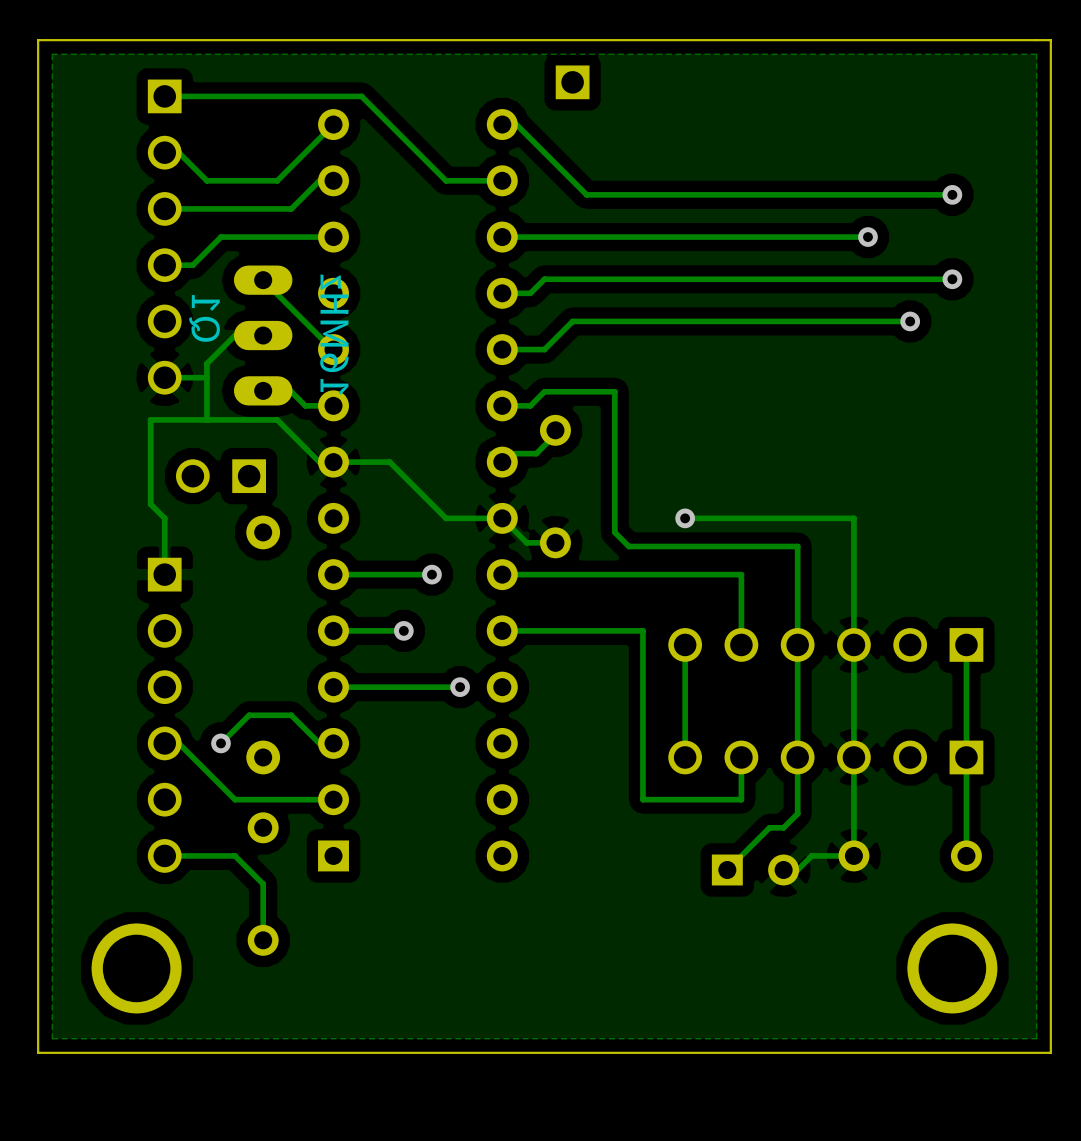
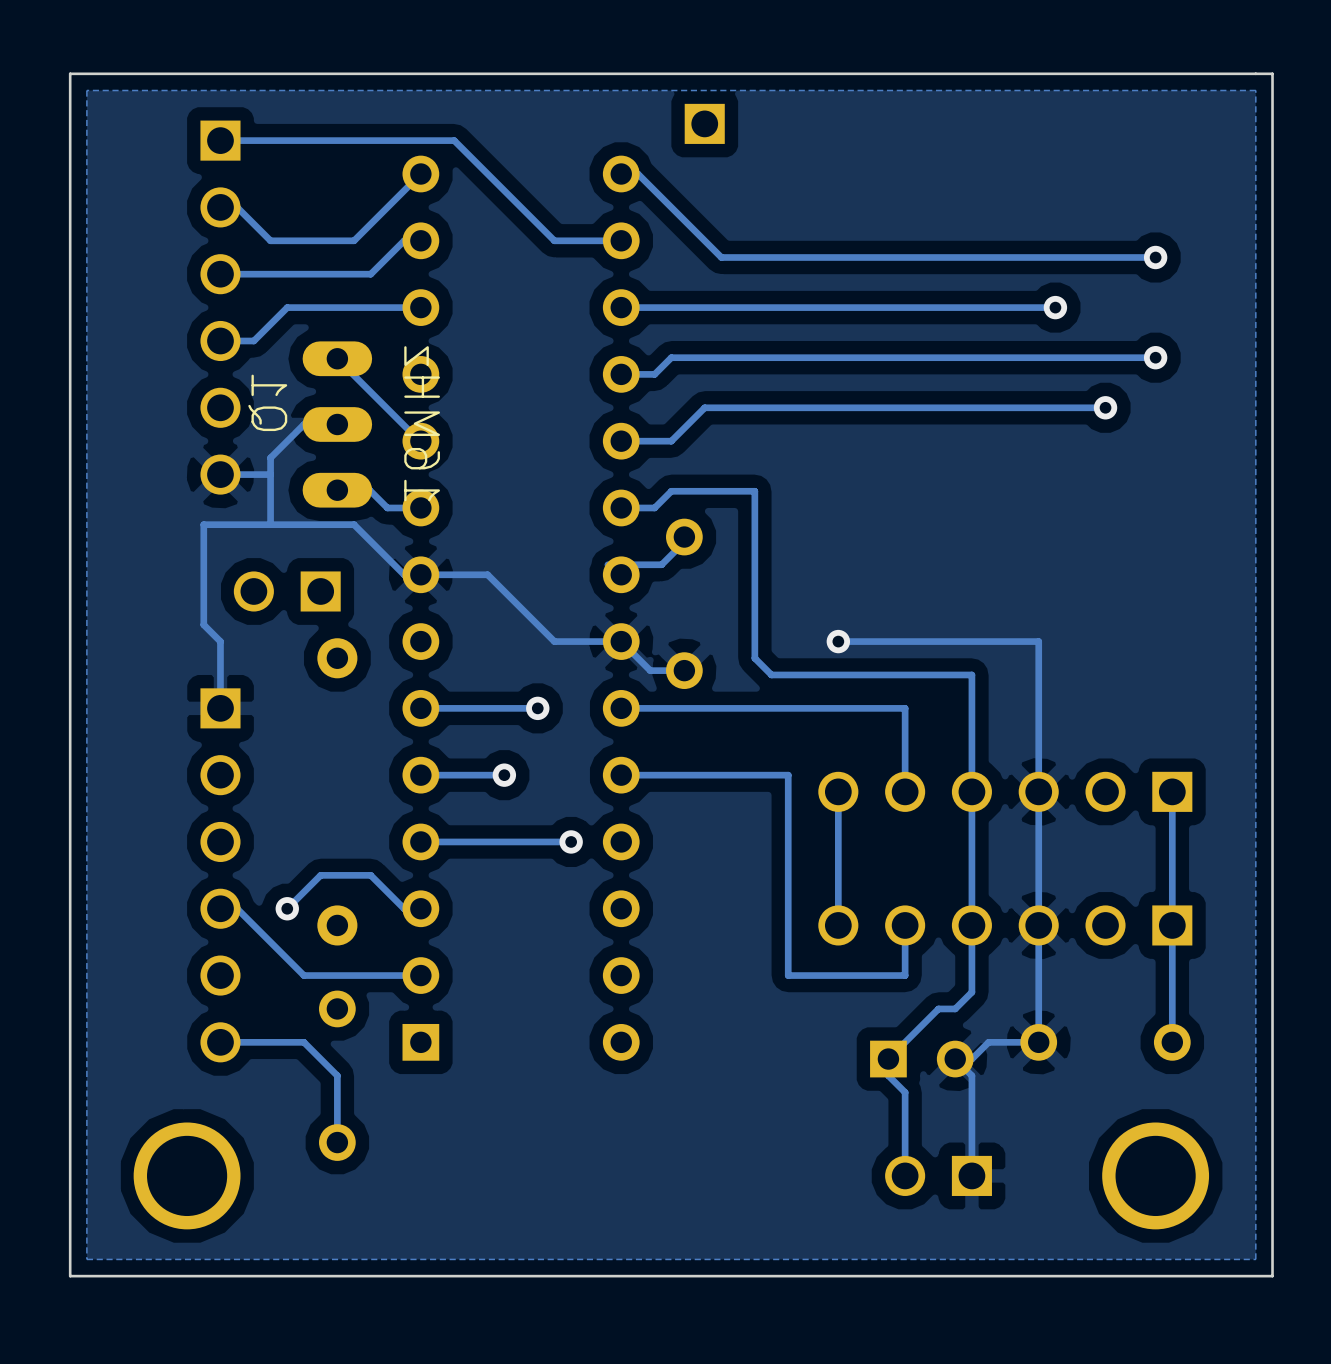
track: none -> (888, 1059) (888, 1075) (905, 1092) (905, 1175)
track: none -> (955, 1059) (971, 1075) (971, 1175)
part: none -> (938, 1175)

